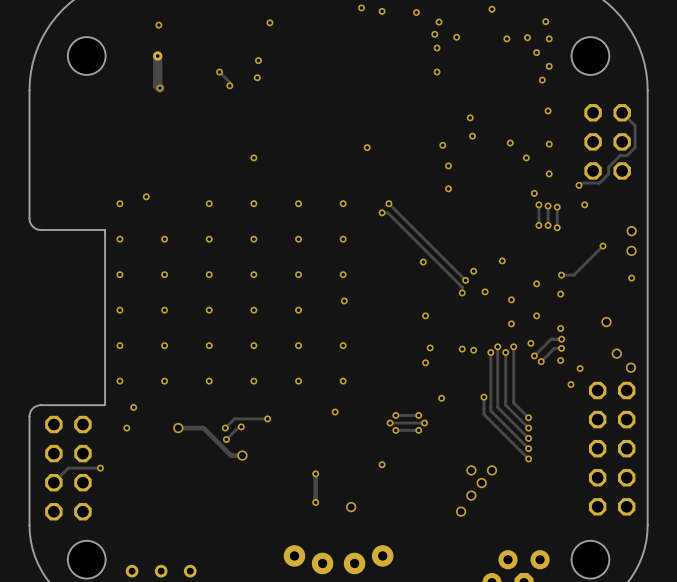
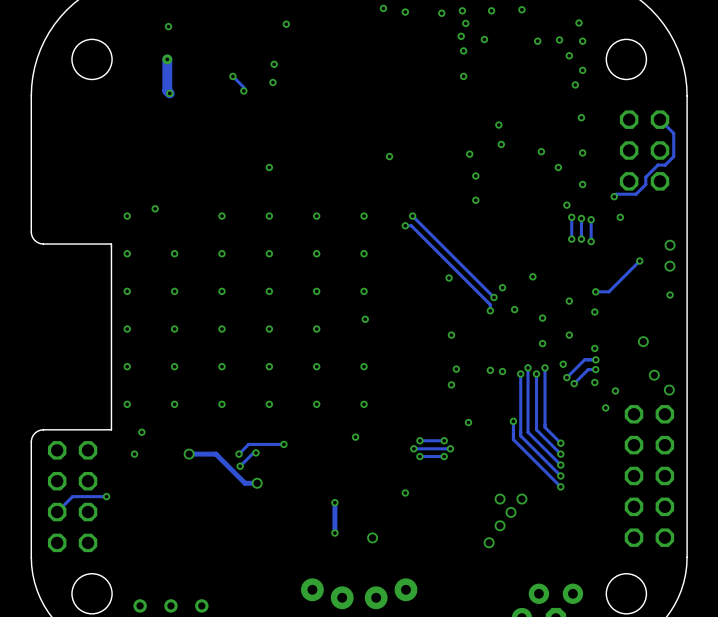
via: none -> (462, 10)
via: none -> (491, 10)

